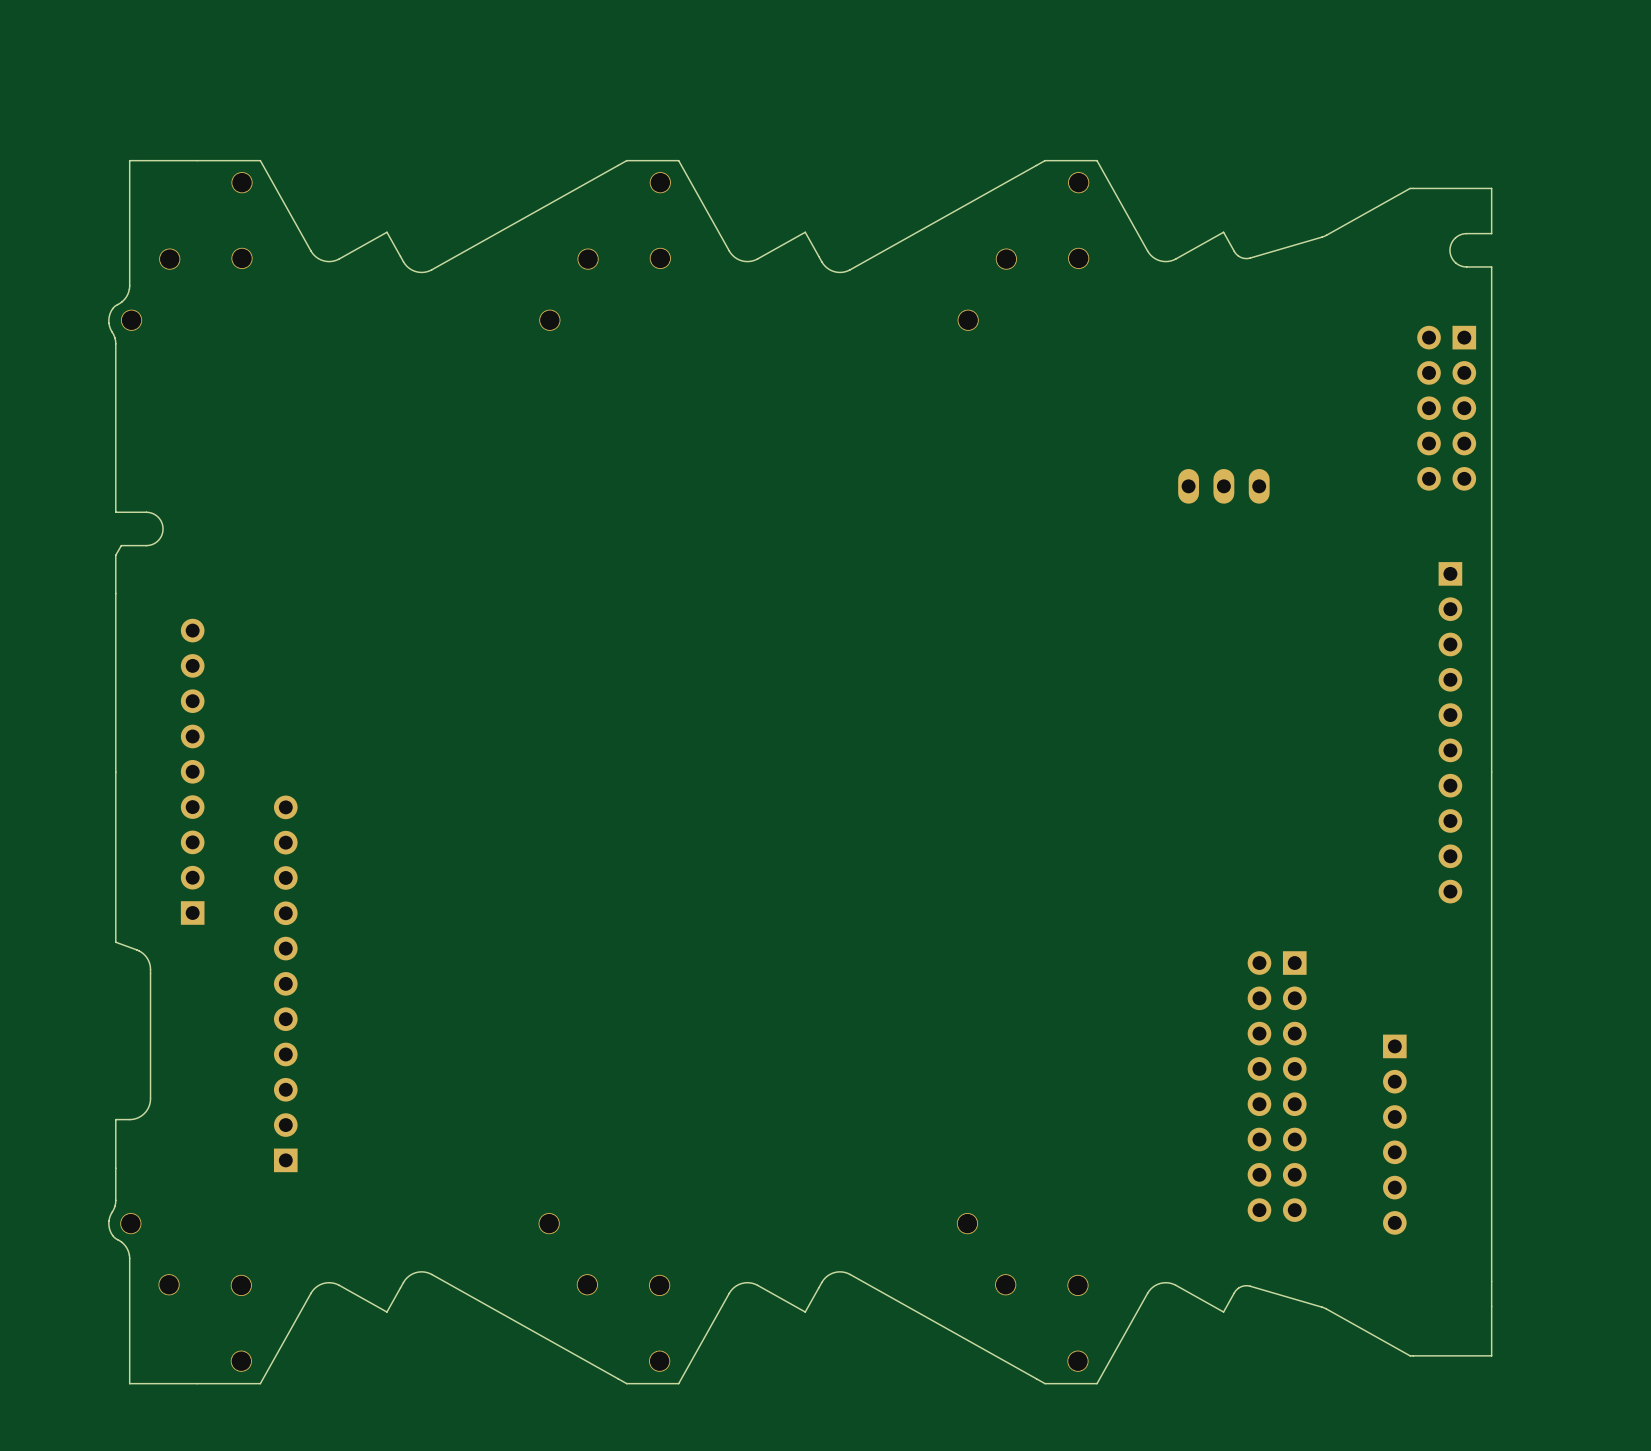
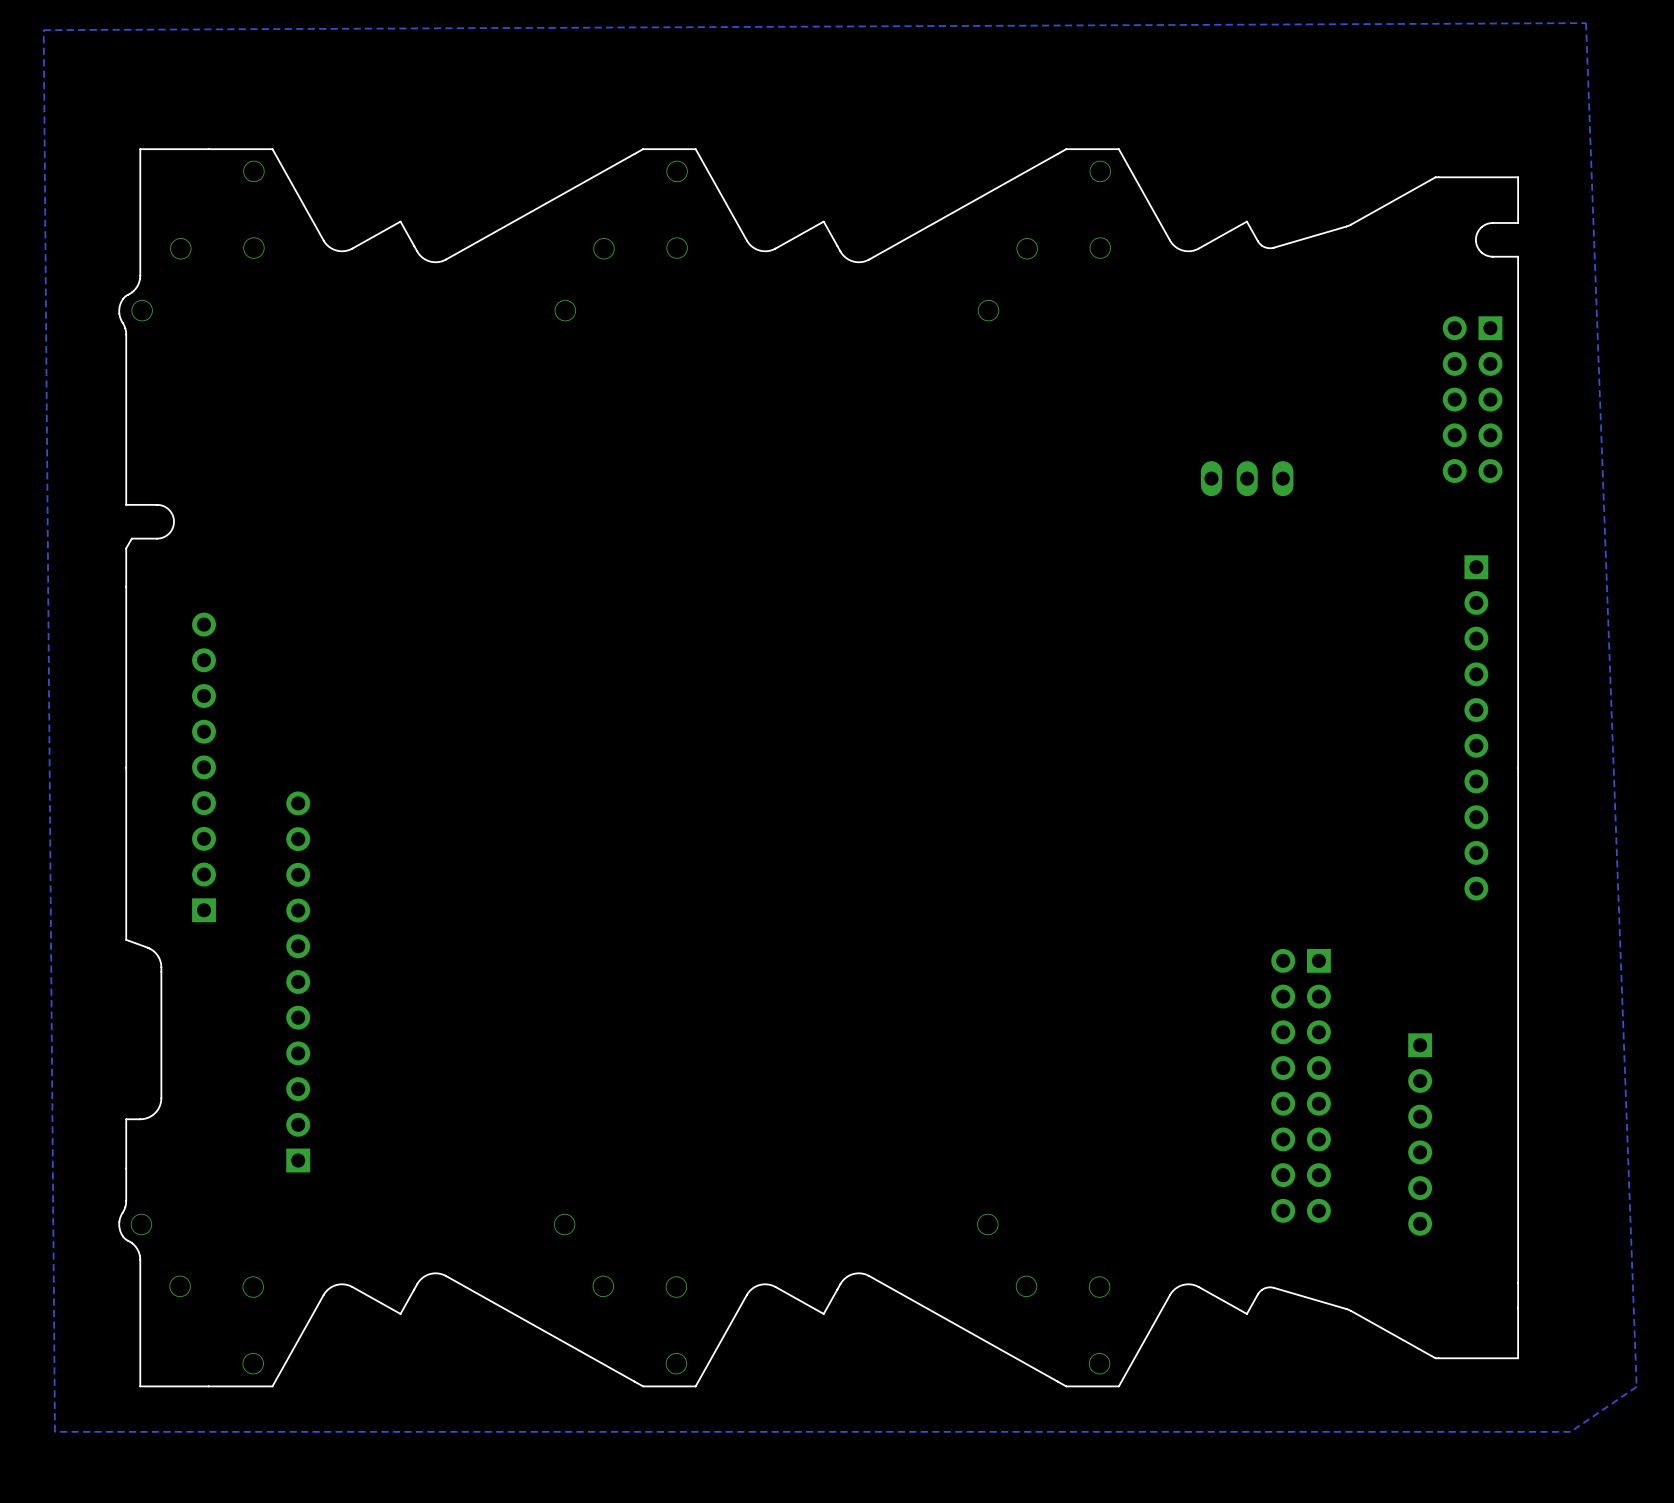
zone outline: none -> (1586, 23) (43, 30) (54, 1431) (1570, 1431) (1636, 1386) (1586, 23)

